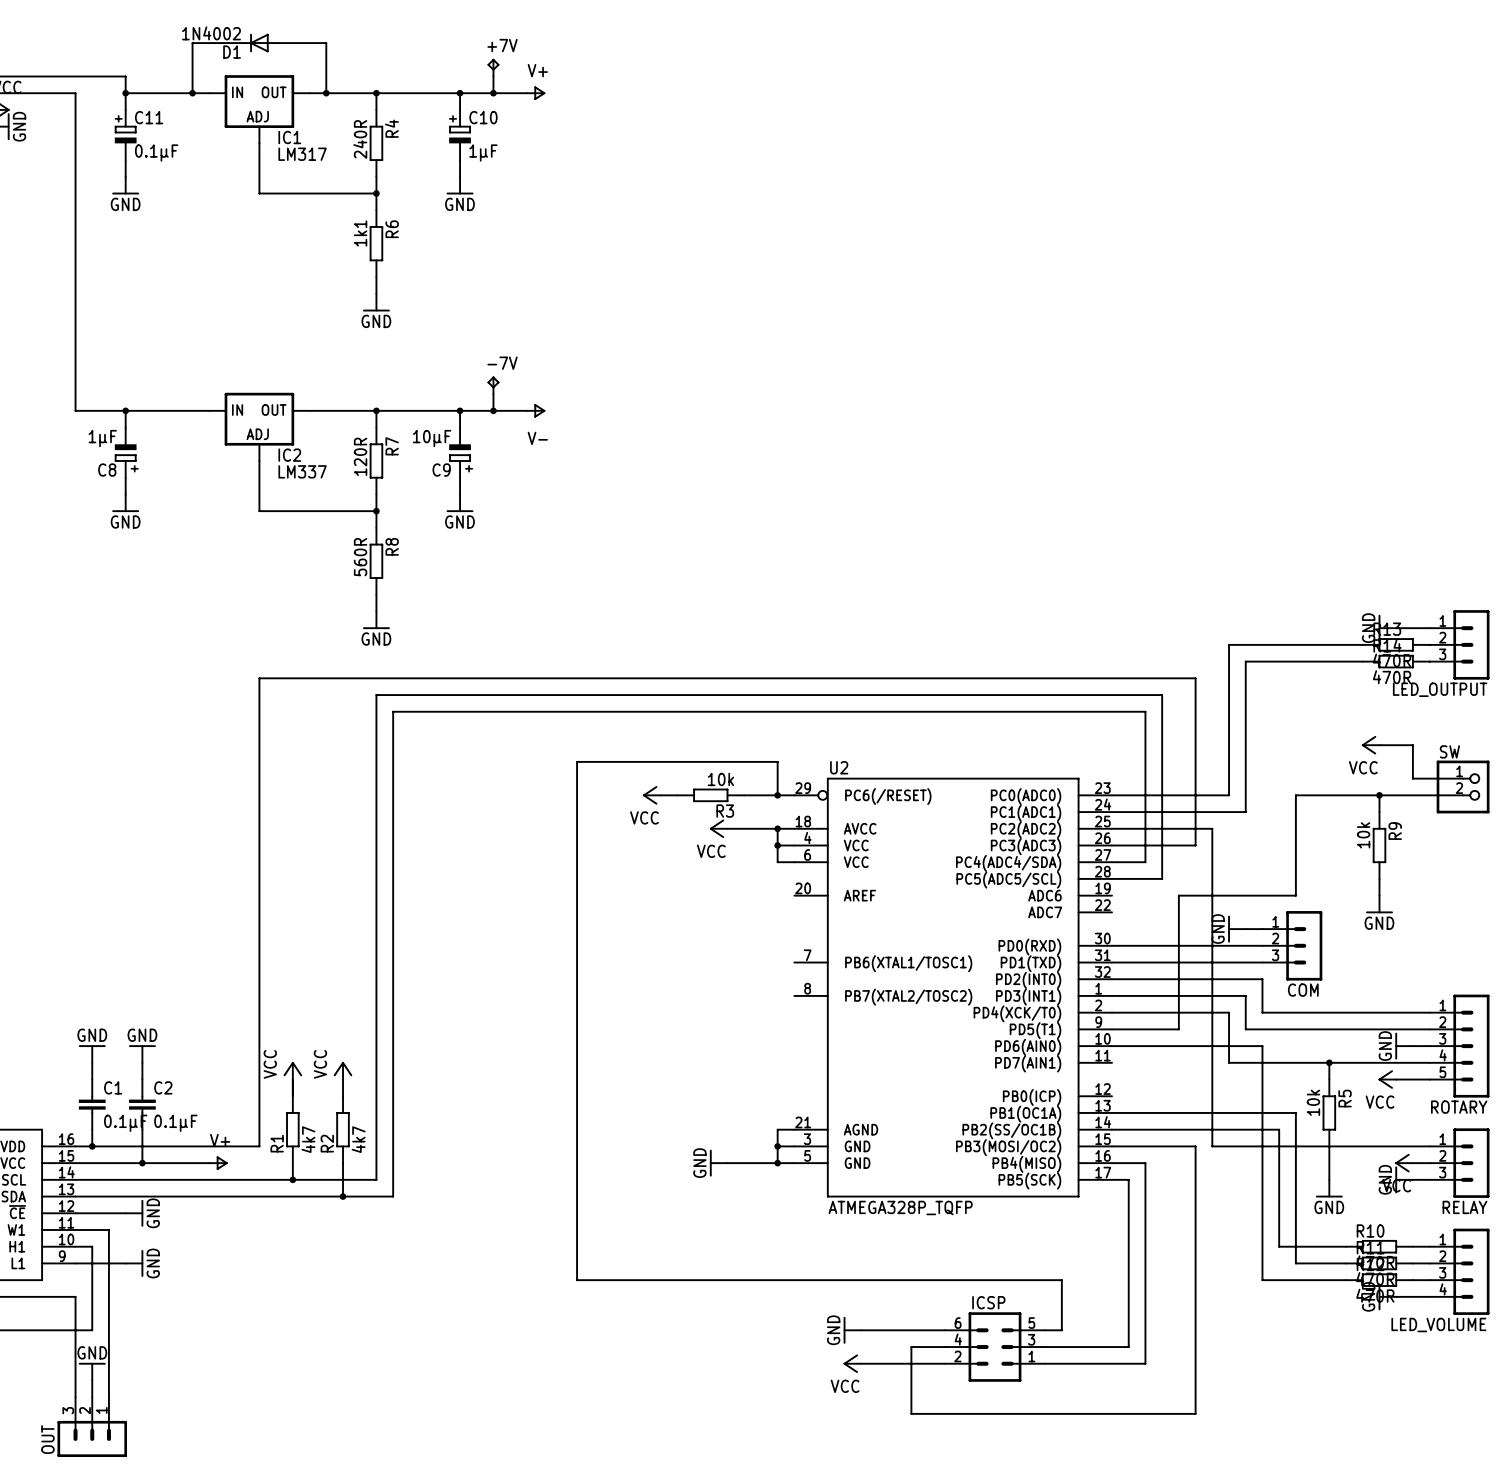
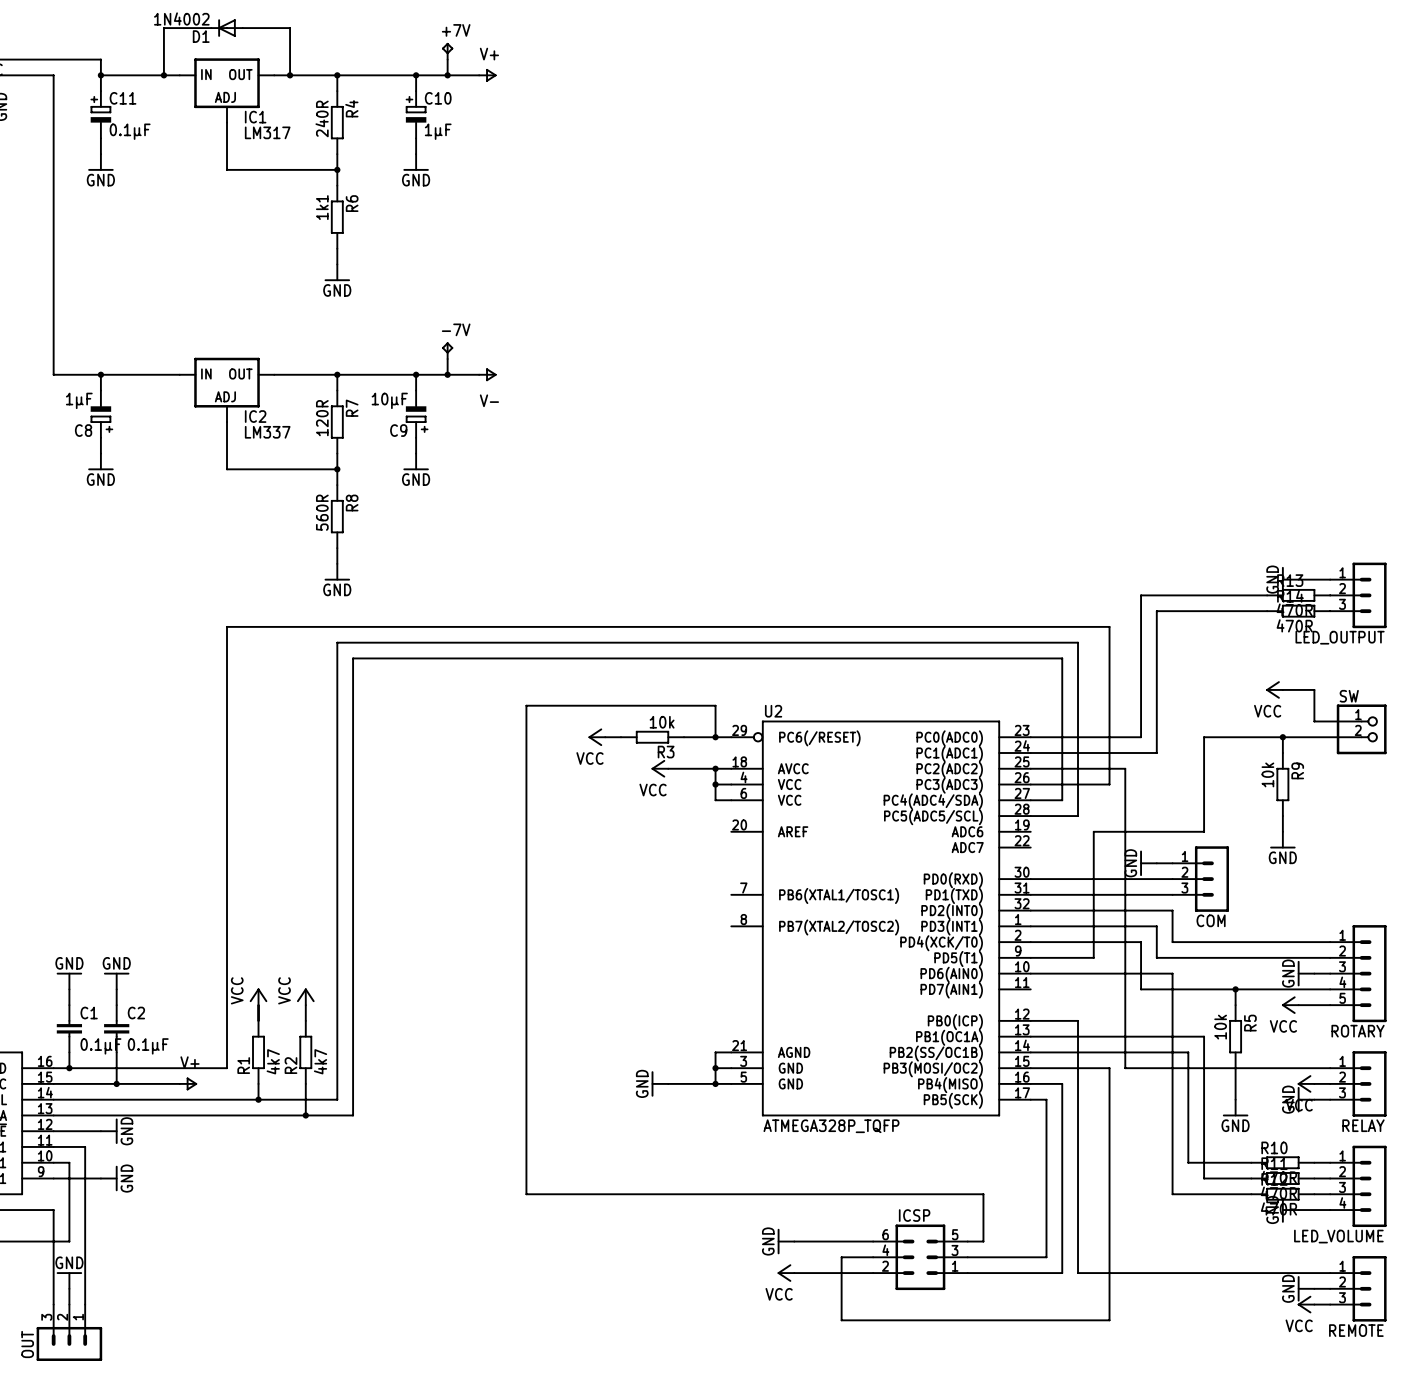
wire: none -> (1030, 1020) (1078, 1020) (1078, 1273) (1330, 1273)
power symbol: none -> GND (1306, 1288)
wire: none -> (1314, 1288) (1330, 1288)
REMOTE: none -> (1358, 1288)
power symbol: none -> VCC (1306, 1304)
wire: none -> (1314, 1304) (1330, 1304)

